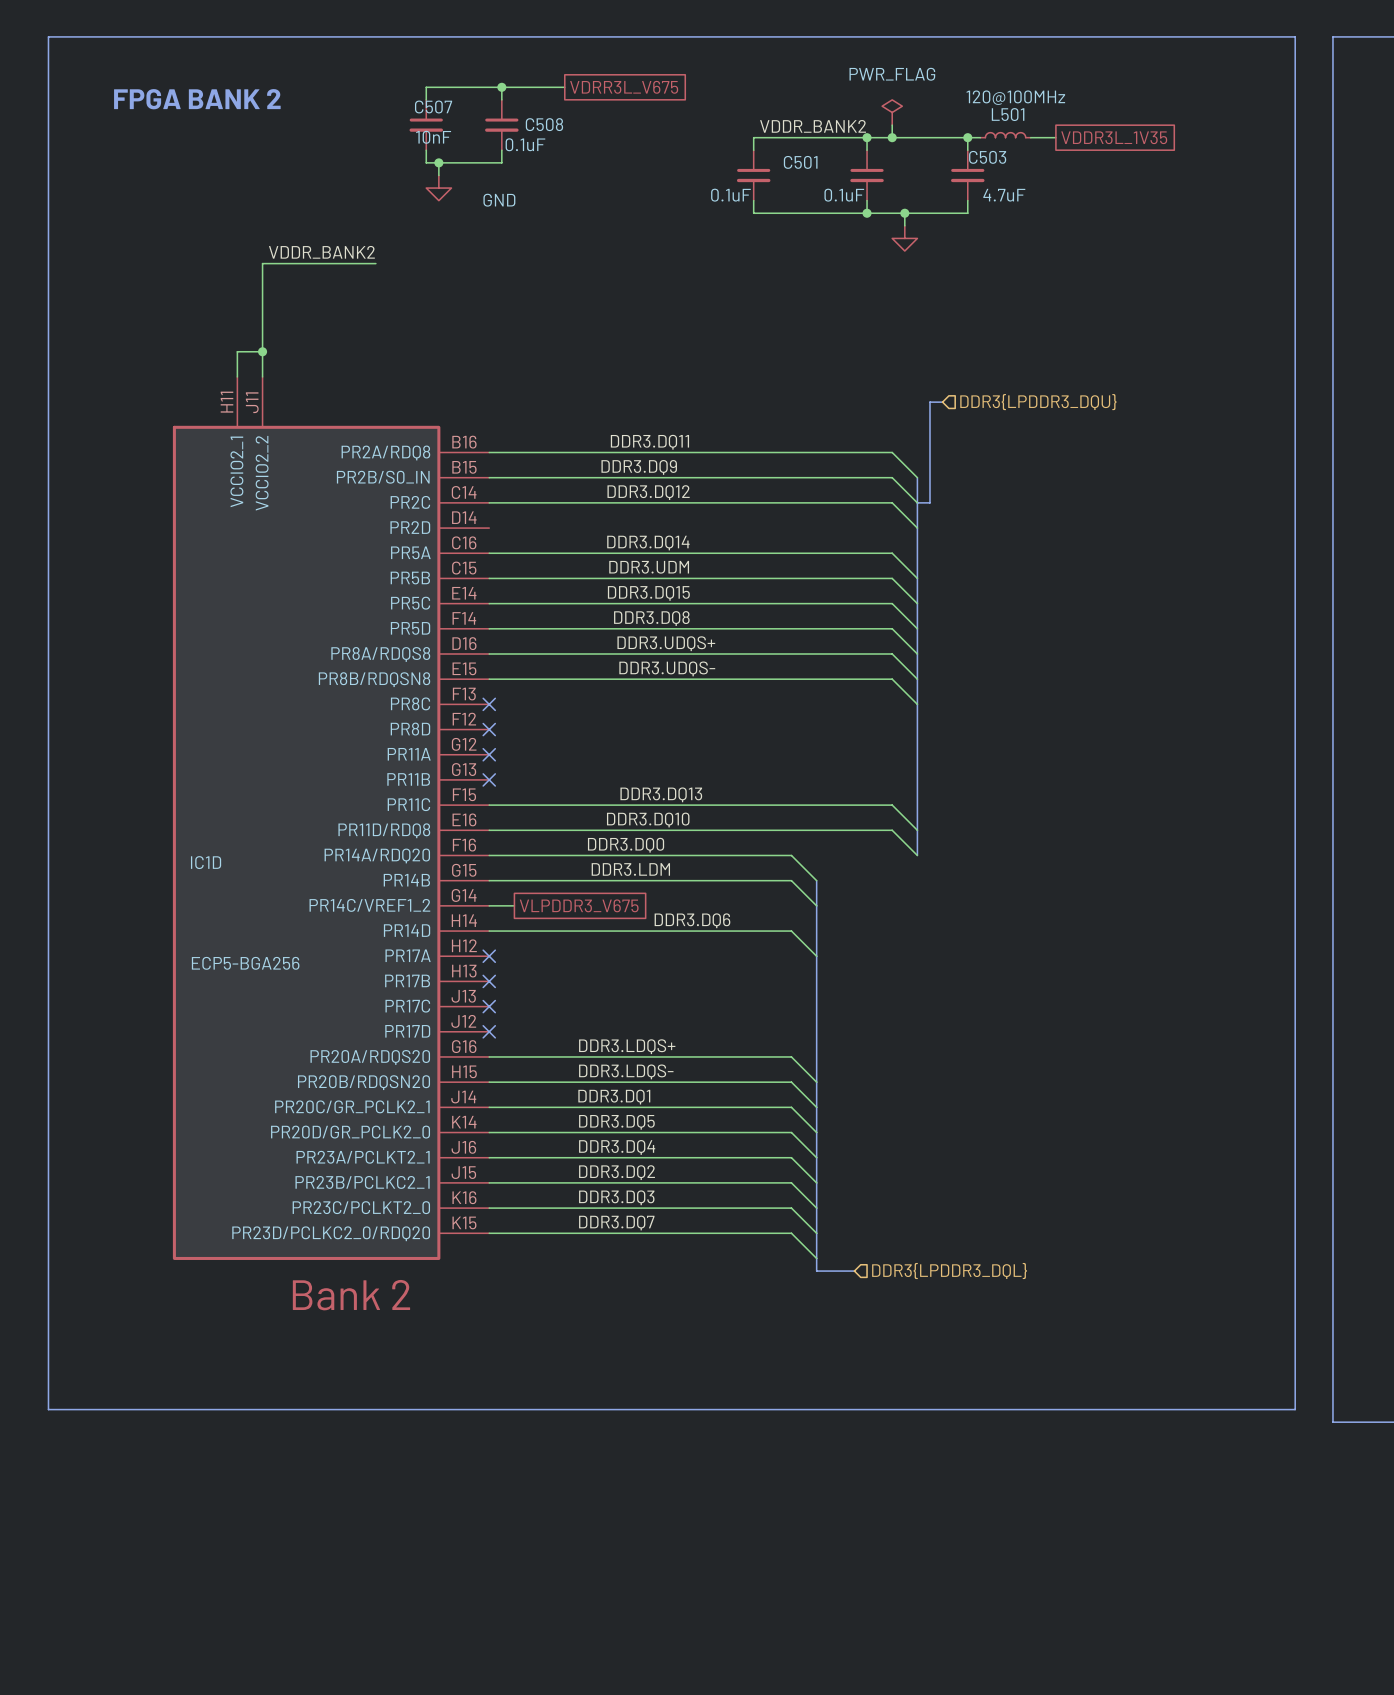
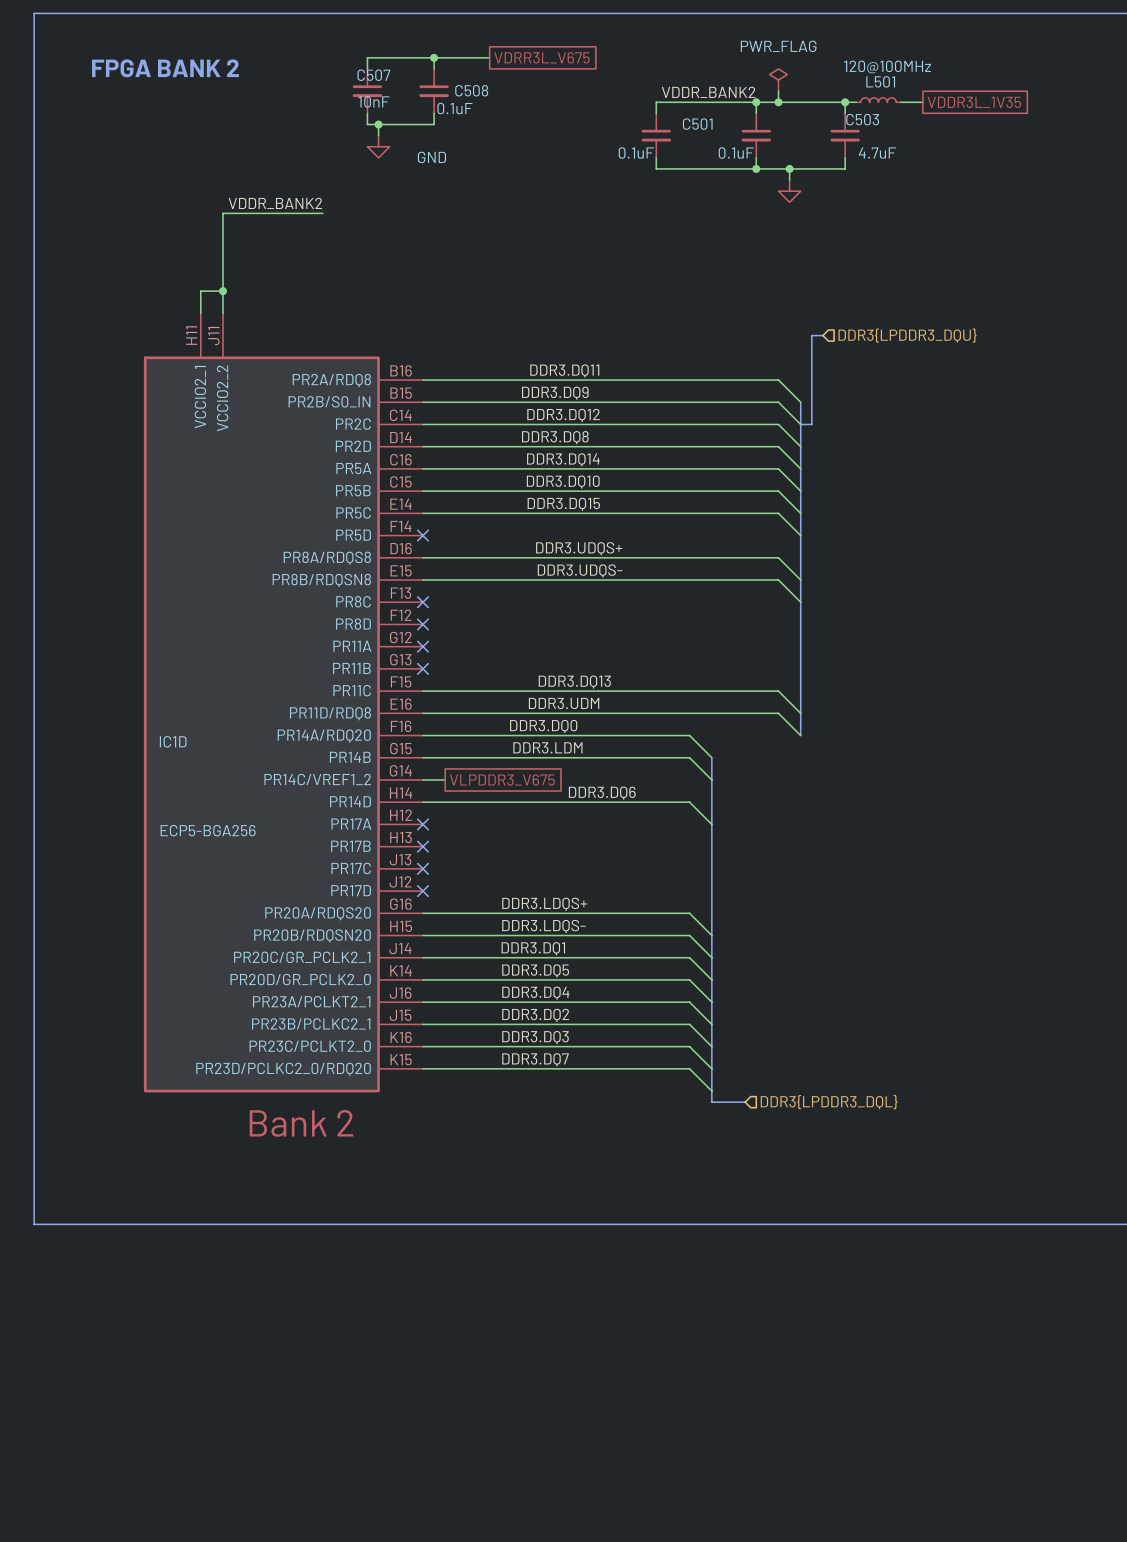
label: DDR3.UDM (649, 567) -> DDR3.DQ10 (563, 482)
label position: DDR3.DQ8 (651, 618) -> DDR3.DQ8 (555, 437)
wire: (489, 628) (892, 628) (917, 654) -> (422, 446) (778, 446) (800, 468)
no-connect mark: none -> (422, 535)
label: DDR3.DQ10 (648, 820) -> DDR3.UDM (564, 703)

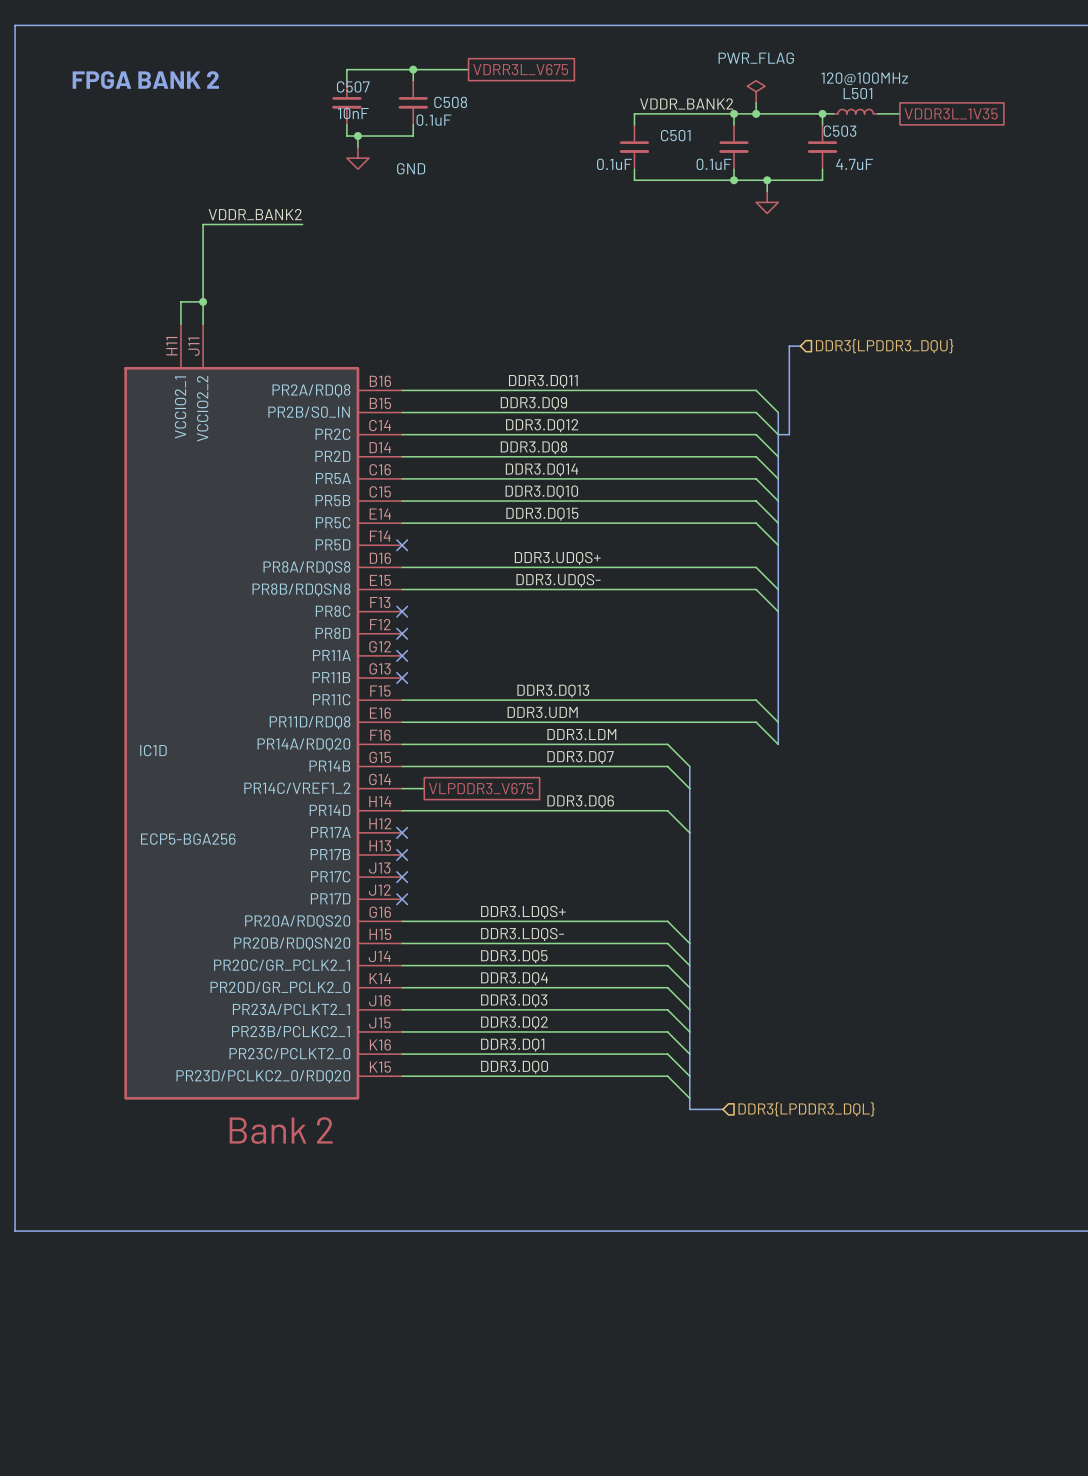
label: DDR3.DQ0 (543, 726) -> DDR3.DQ7 (580, 757)
label position: DDR3.LDM (547, 747) -> DDR3.LDM (581, 734)
label: DDR3.DQ1 (533, 948) -> DDR3.DQ5 (514, 956)
label: DDR3.DQ5 (535, 970) -> DDR3.DQ4 (514, 978)
label: DDR3.DQ4 (535, 993) -> DDR3.DQ3 (514, 1000)
label: DDR3.DQ3 (535, 1037) -> DDR3.DQ1 (512, 1045)
label: DDR3.DQ7 (535, 1059) -> DDR3.DQ0 (514, 1067)

